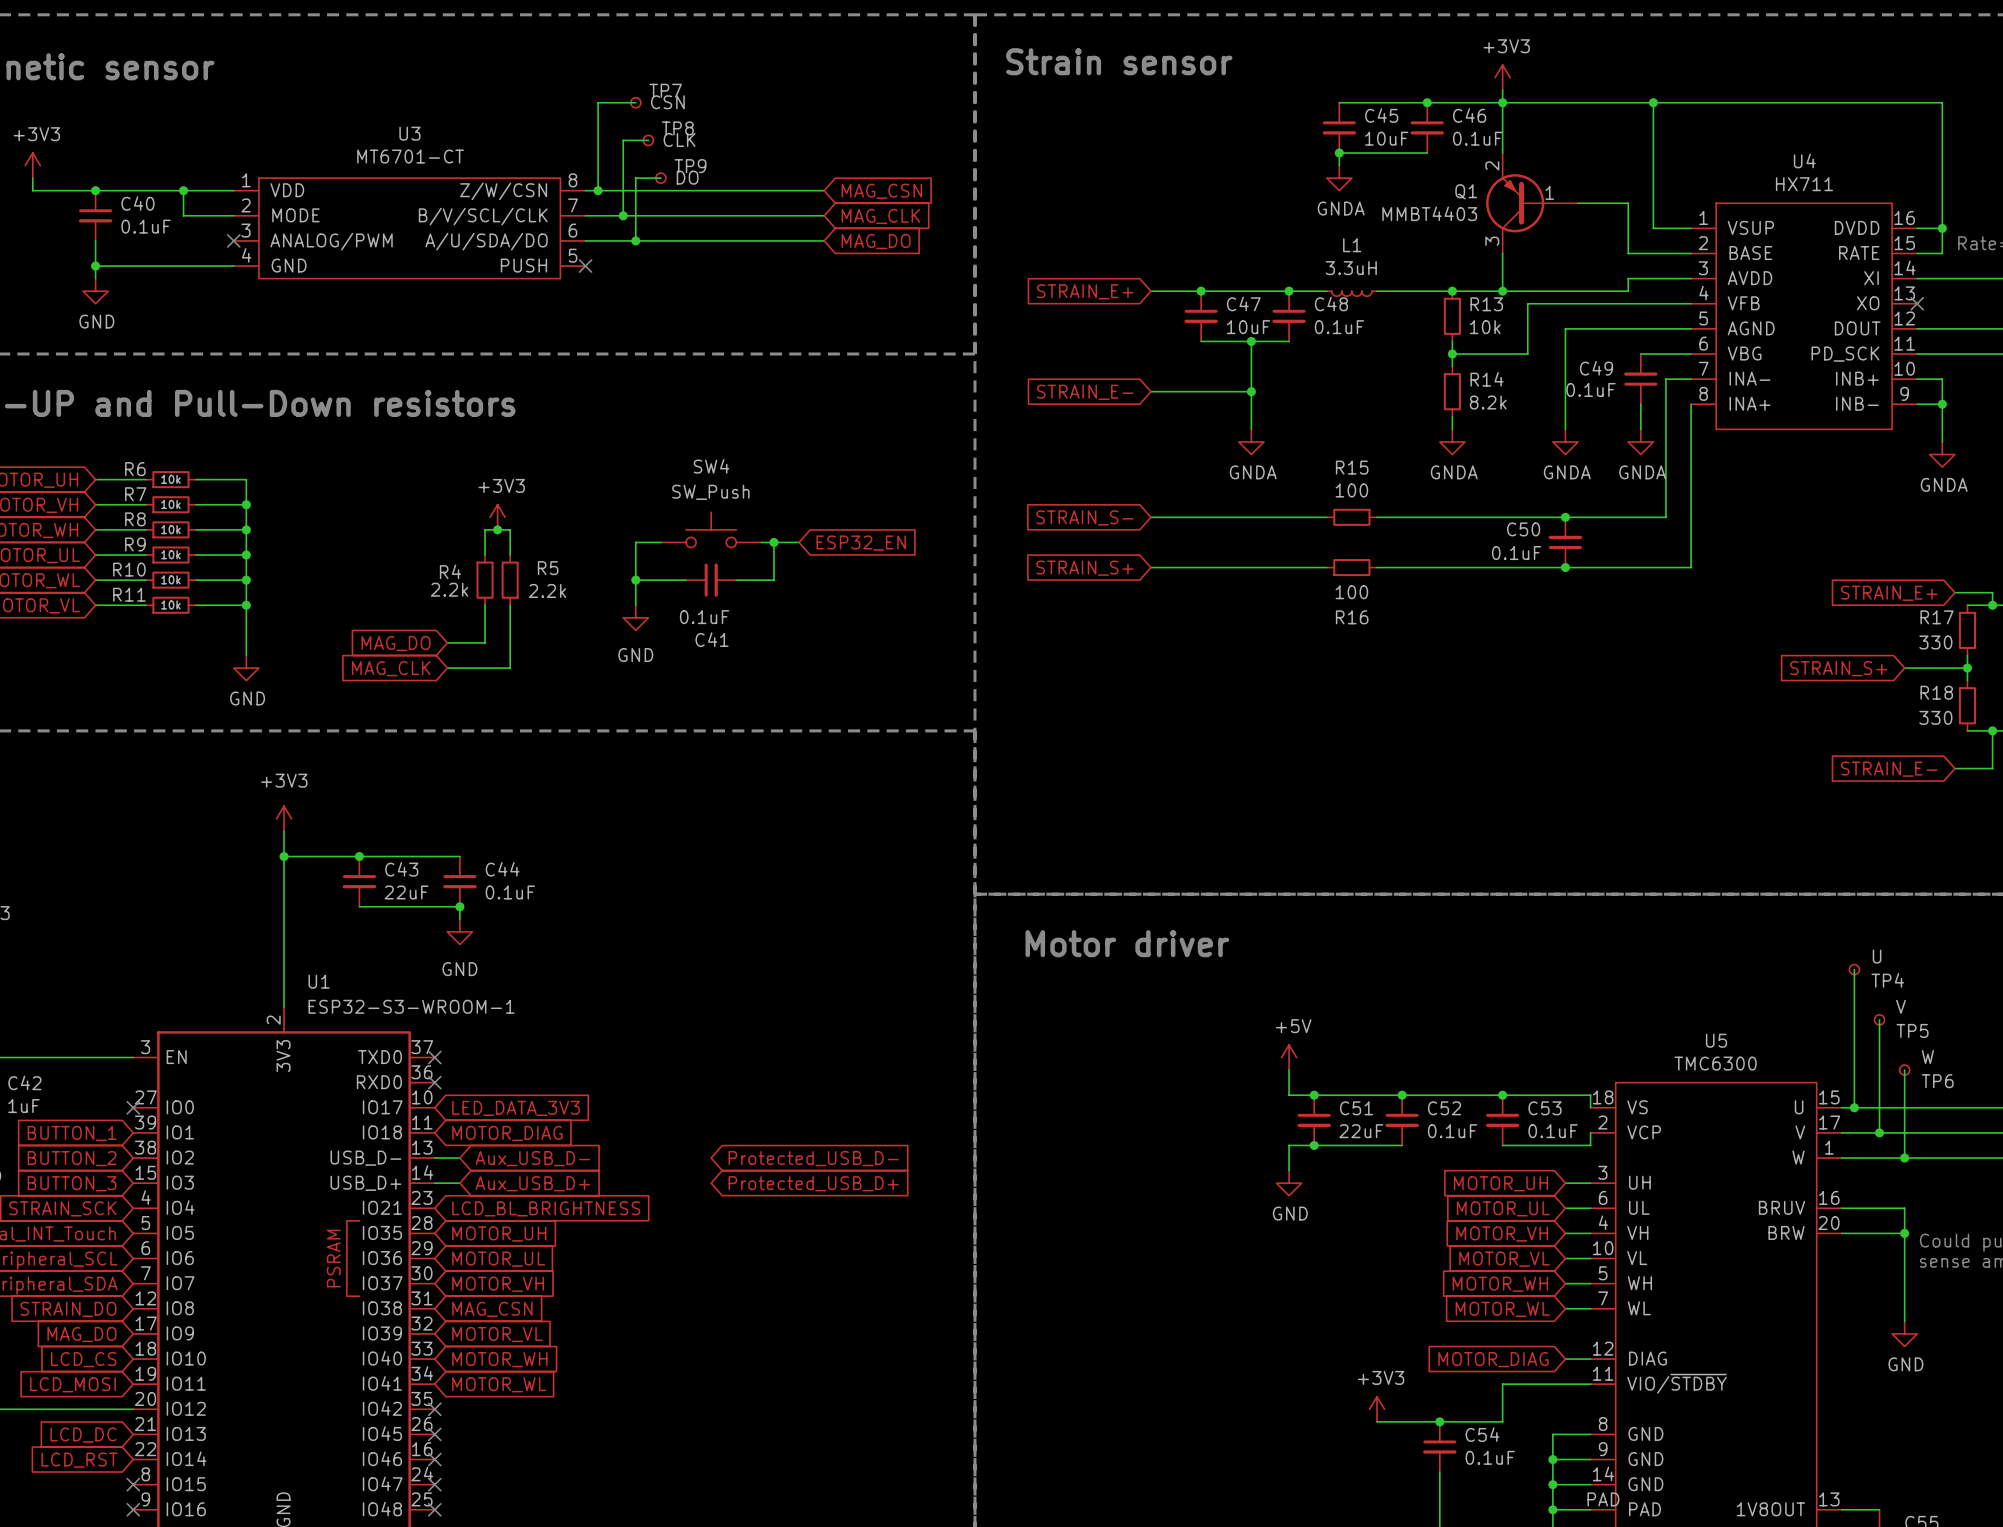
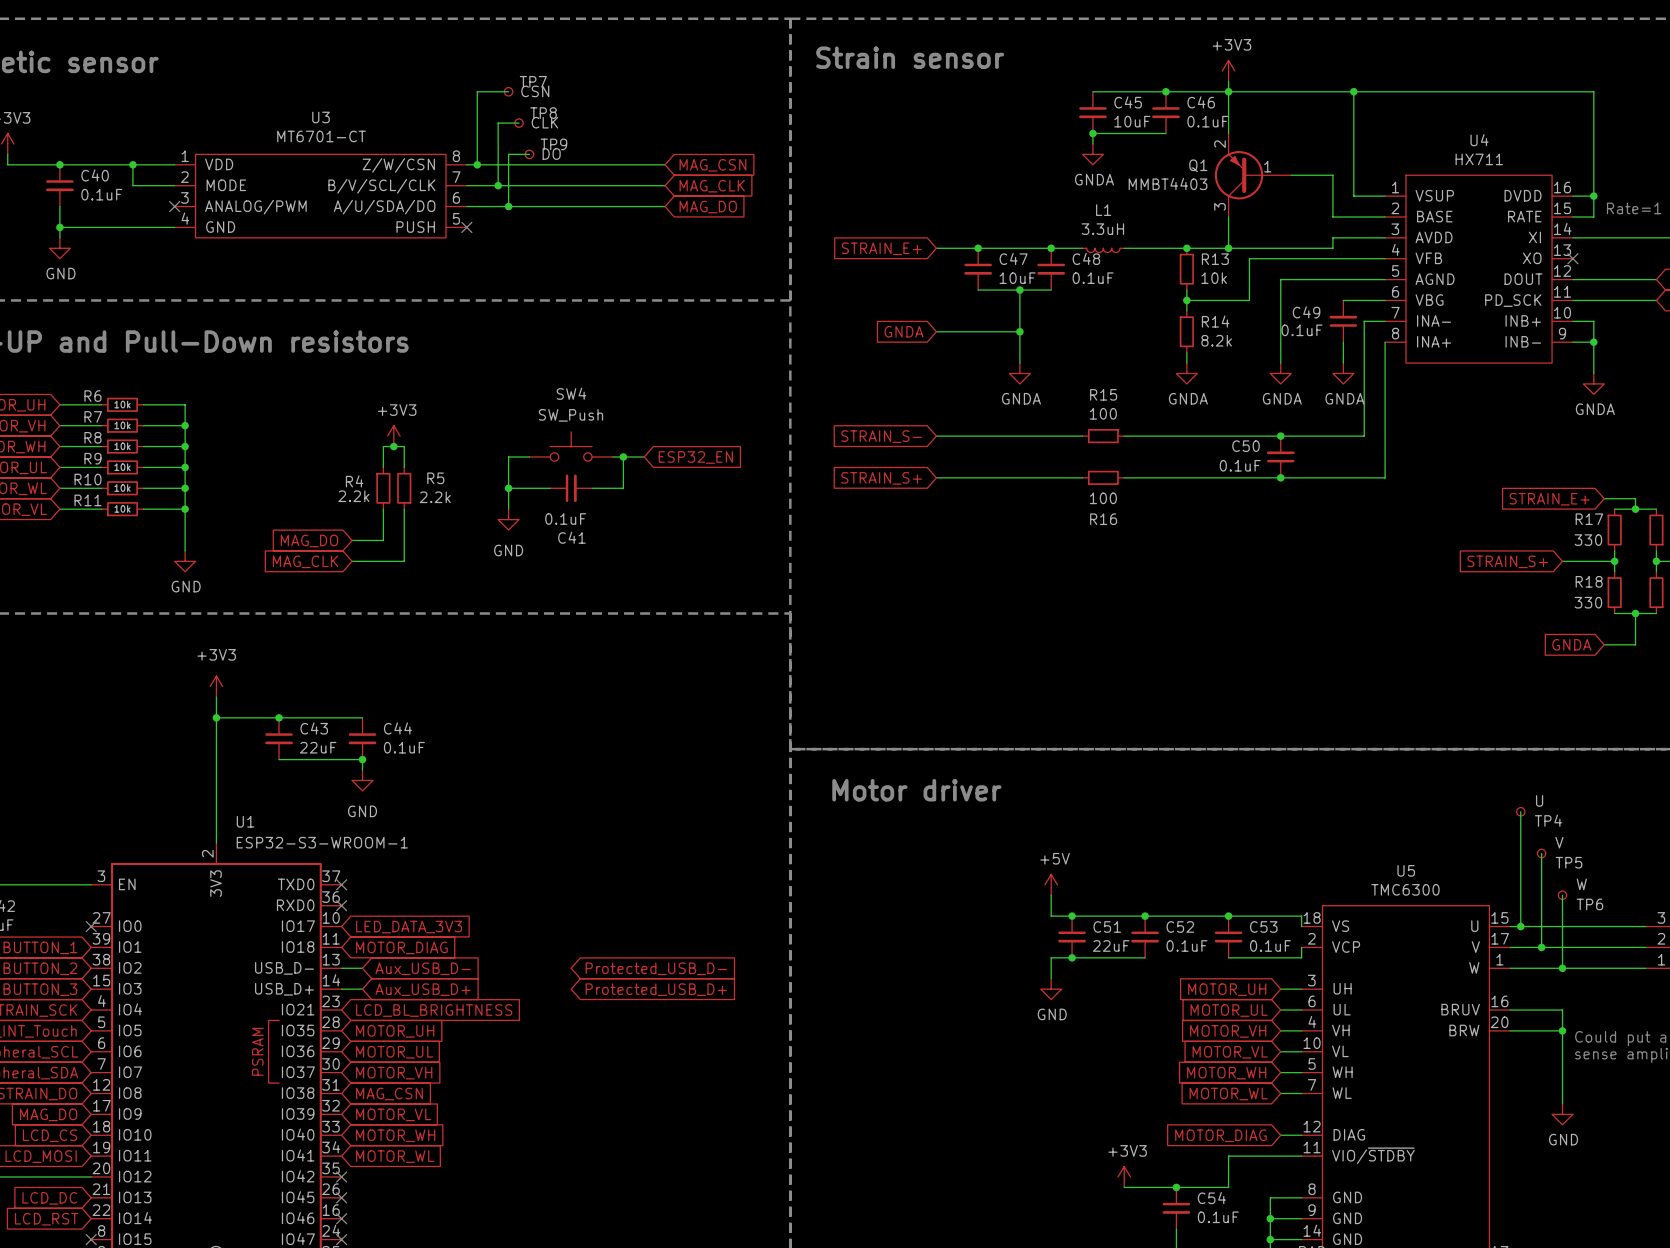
global label: STRAIN_E- (1085, 392) -> GNDA (903, 331)
global label: STRAIN_E- (1889, 769) -> GNDA (1571, 644)

